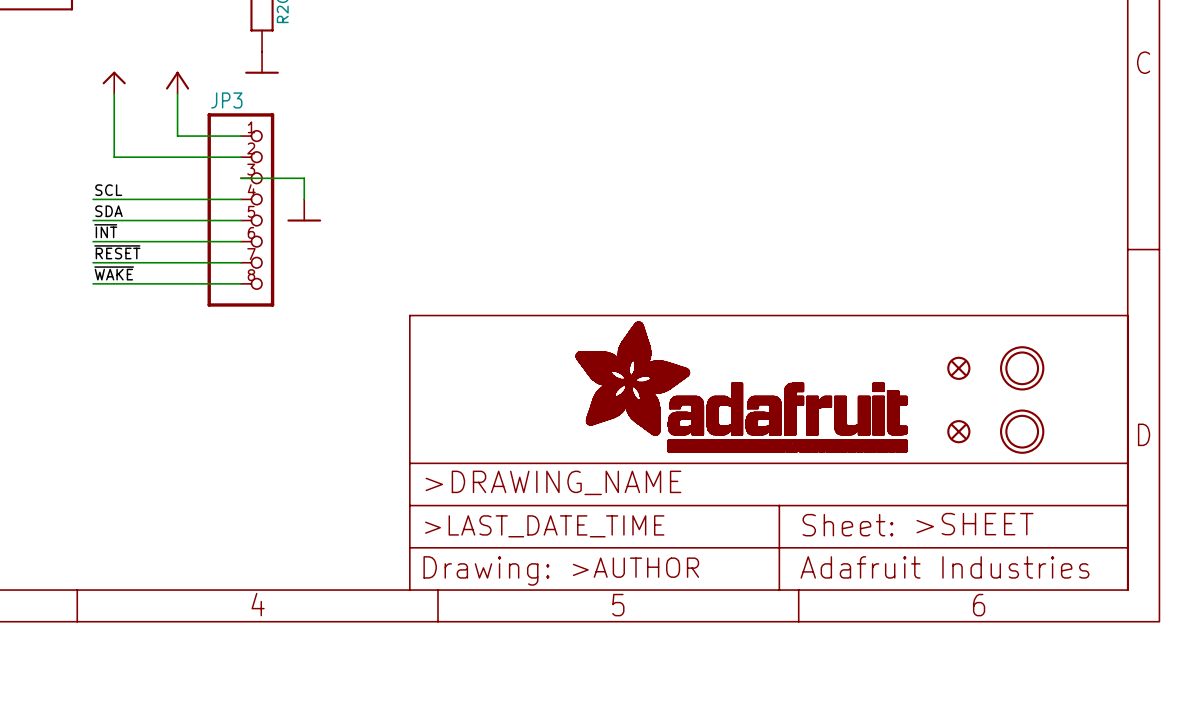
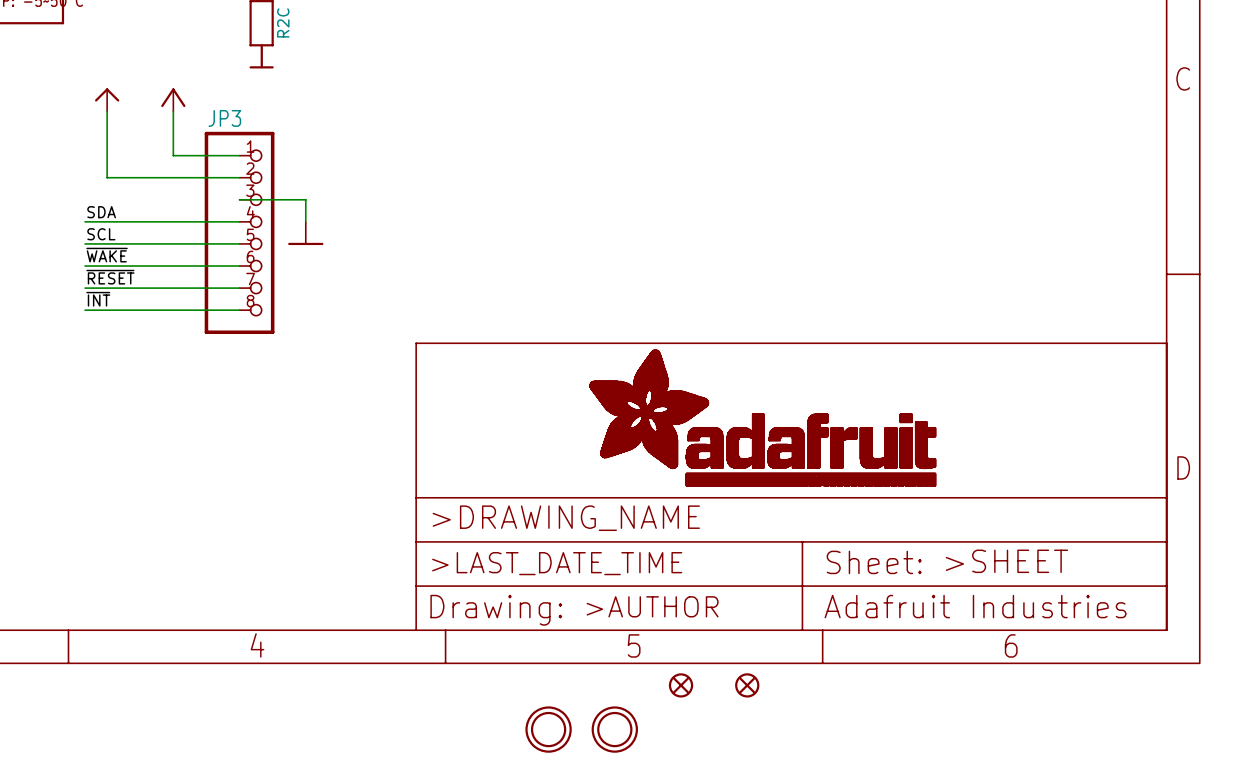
power symbol: none -> (261, 56)
power symbol: (262, 62) -> none
label: SCL (108, 190) -> SDA (101, 212)
label: SDA (108, 211) -> SCL (101, 234)
label: ~{INT} (105, 231) -> ~{WAKE} (107, 255)
label: ~{WAKE} (114, 273) -> ~{INT} (98, 299)
part: (958, 368) -> none
part: (1022, 368) -> none
part: (958, 431) -> none
part: (1022, 431) -> none
part: none -> (681, 685)
part: none -> (747, 685)
part: none -> (548, 729)
part: none -> (614, 729)

